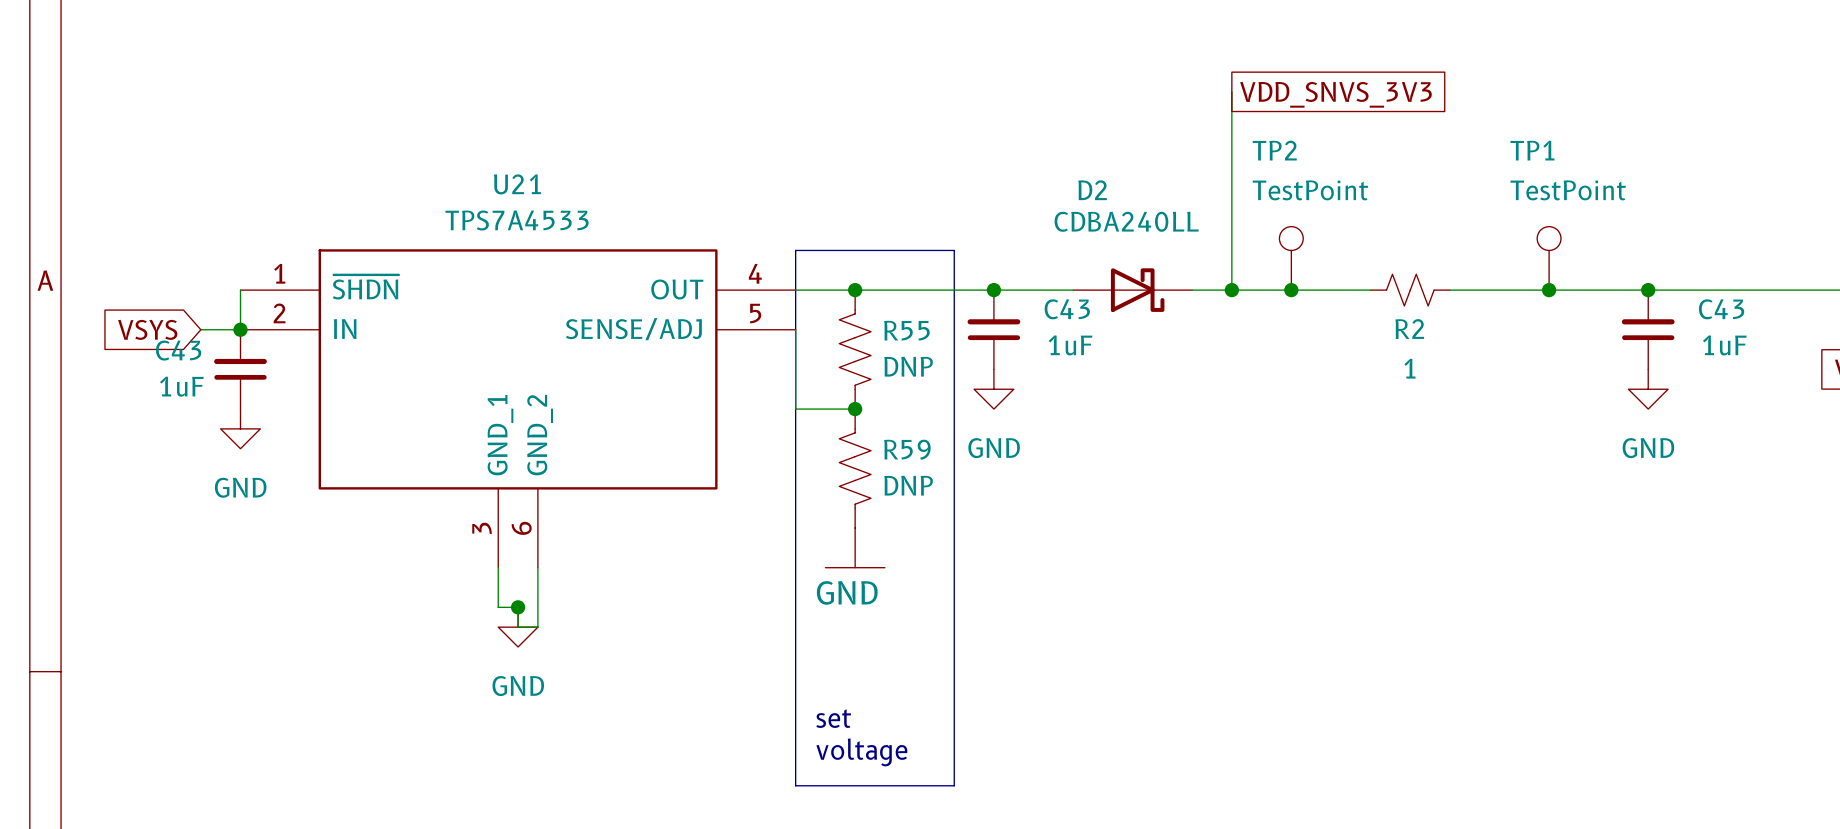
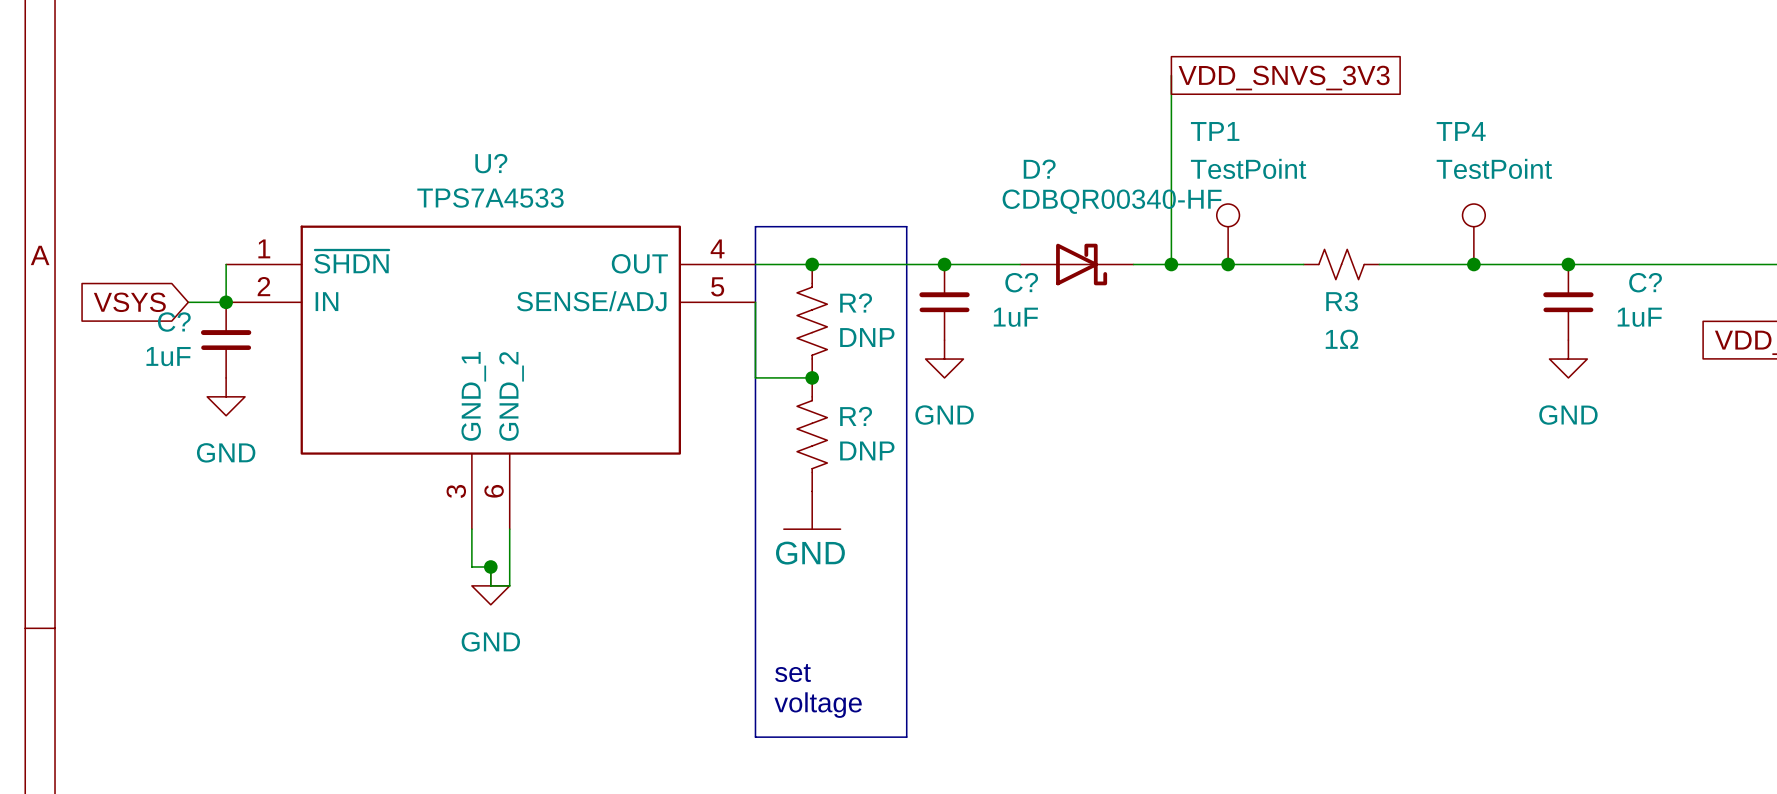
TP2 name: TP2 (1274, 150) -> TP1 (1215, 131)
TP1 name: TP1 (1532, 150) -> TP4 (1461, 131)
U21 name: U21 (517, 184) -> U? (491, 163)
D2 name: D2 (1092, 190) -> D? (1039, 169)
D2 value: CDBA240LL (1126, 221) -> CDBQR00340-HF (1112, 201)
C43 name: C43 (1067, 309) -> C? (1021, 282)
C43 name: C43 (1721, 309) -> C? (1645, 282)
R2 name: R2 (1409, 329) -> R3 (1342, 301)
R55 name: R55 (906, 330) -> R? (856, 302)
C43 name: C43 (178, 350) -> C? (174, 322)
R2 value: 1 (1409, 368) -> 1Ω (1342, 339)
R59 name: R59 (907, 449) -> R? (856, 416)

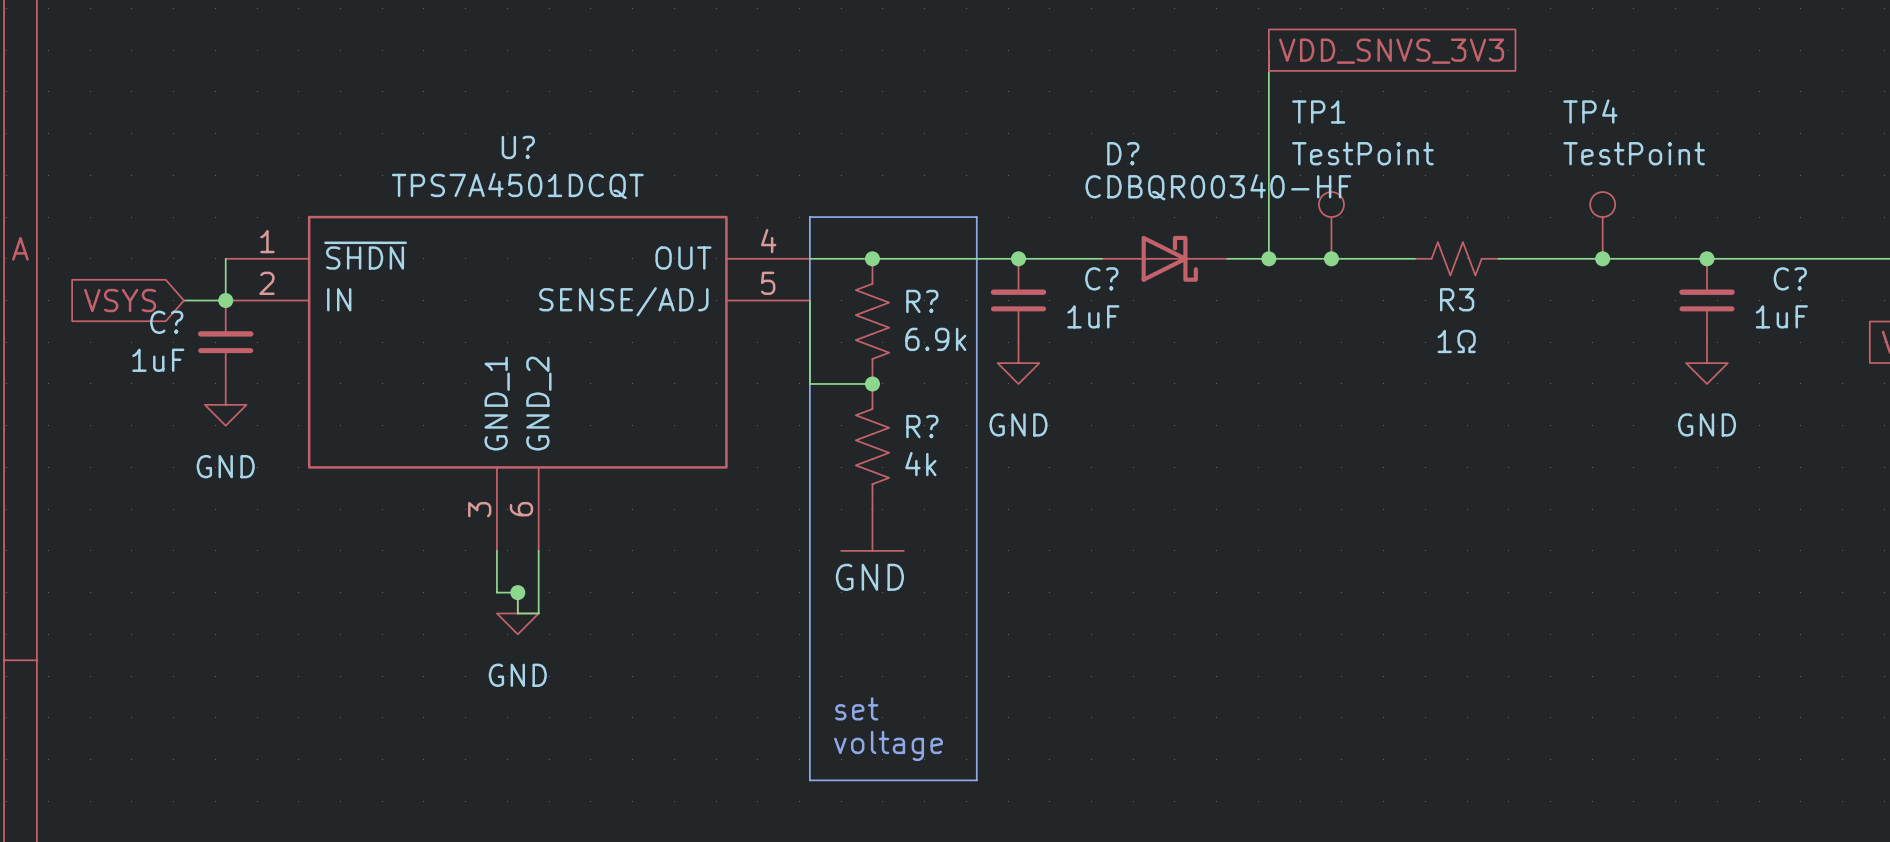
U? value: TPS7A4533 (490, 198) -> TPS7A4501DCQT (517, 185)
R? value: DNP (867, 337) -> 6.9k (935, 339)
R? value: DNP (867, 450) -> 4k (920, 464)

